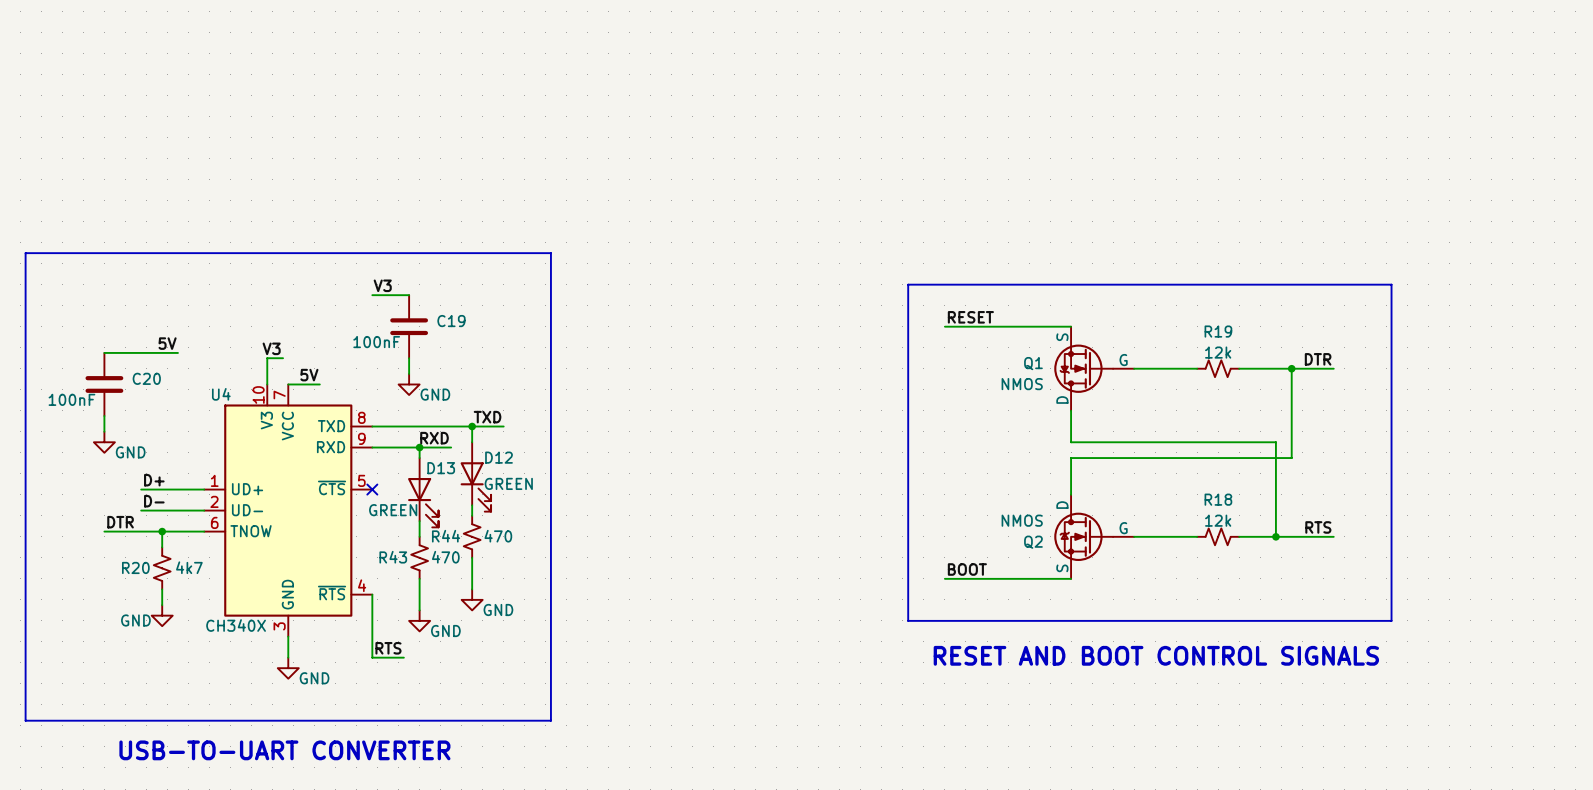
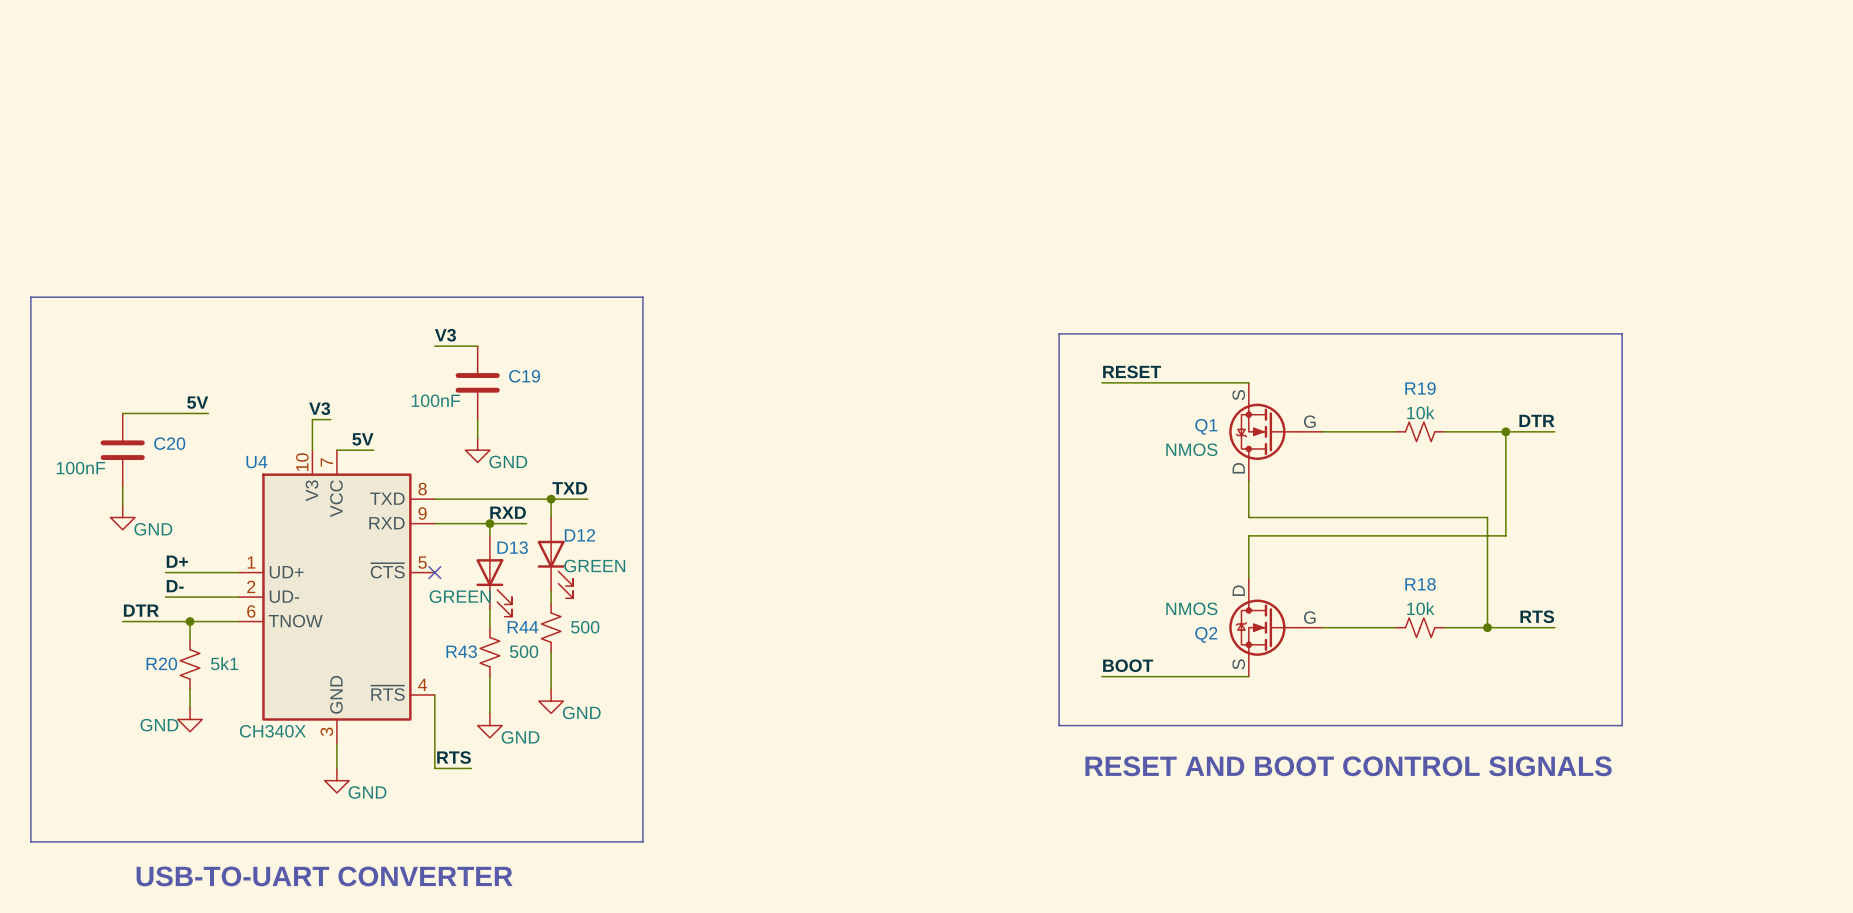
R19 value: 12k (1218, 352) -> 10k (1420, 412)
R18 value: 12k (1218, 520) -> 10k (1420, 608)
R44 value: 470 (498, 536) -> 500 (585, 627)
R43 value: 470 (445, 557) -> 500 (524, 651)
R20 value: 4k7 (189, 567) -> 5k1 (224, 663)

